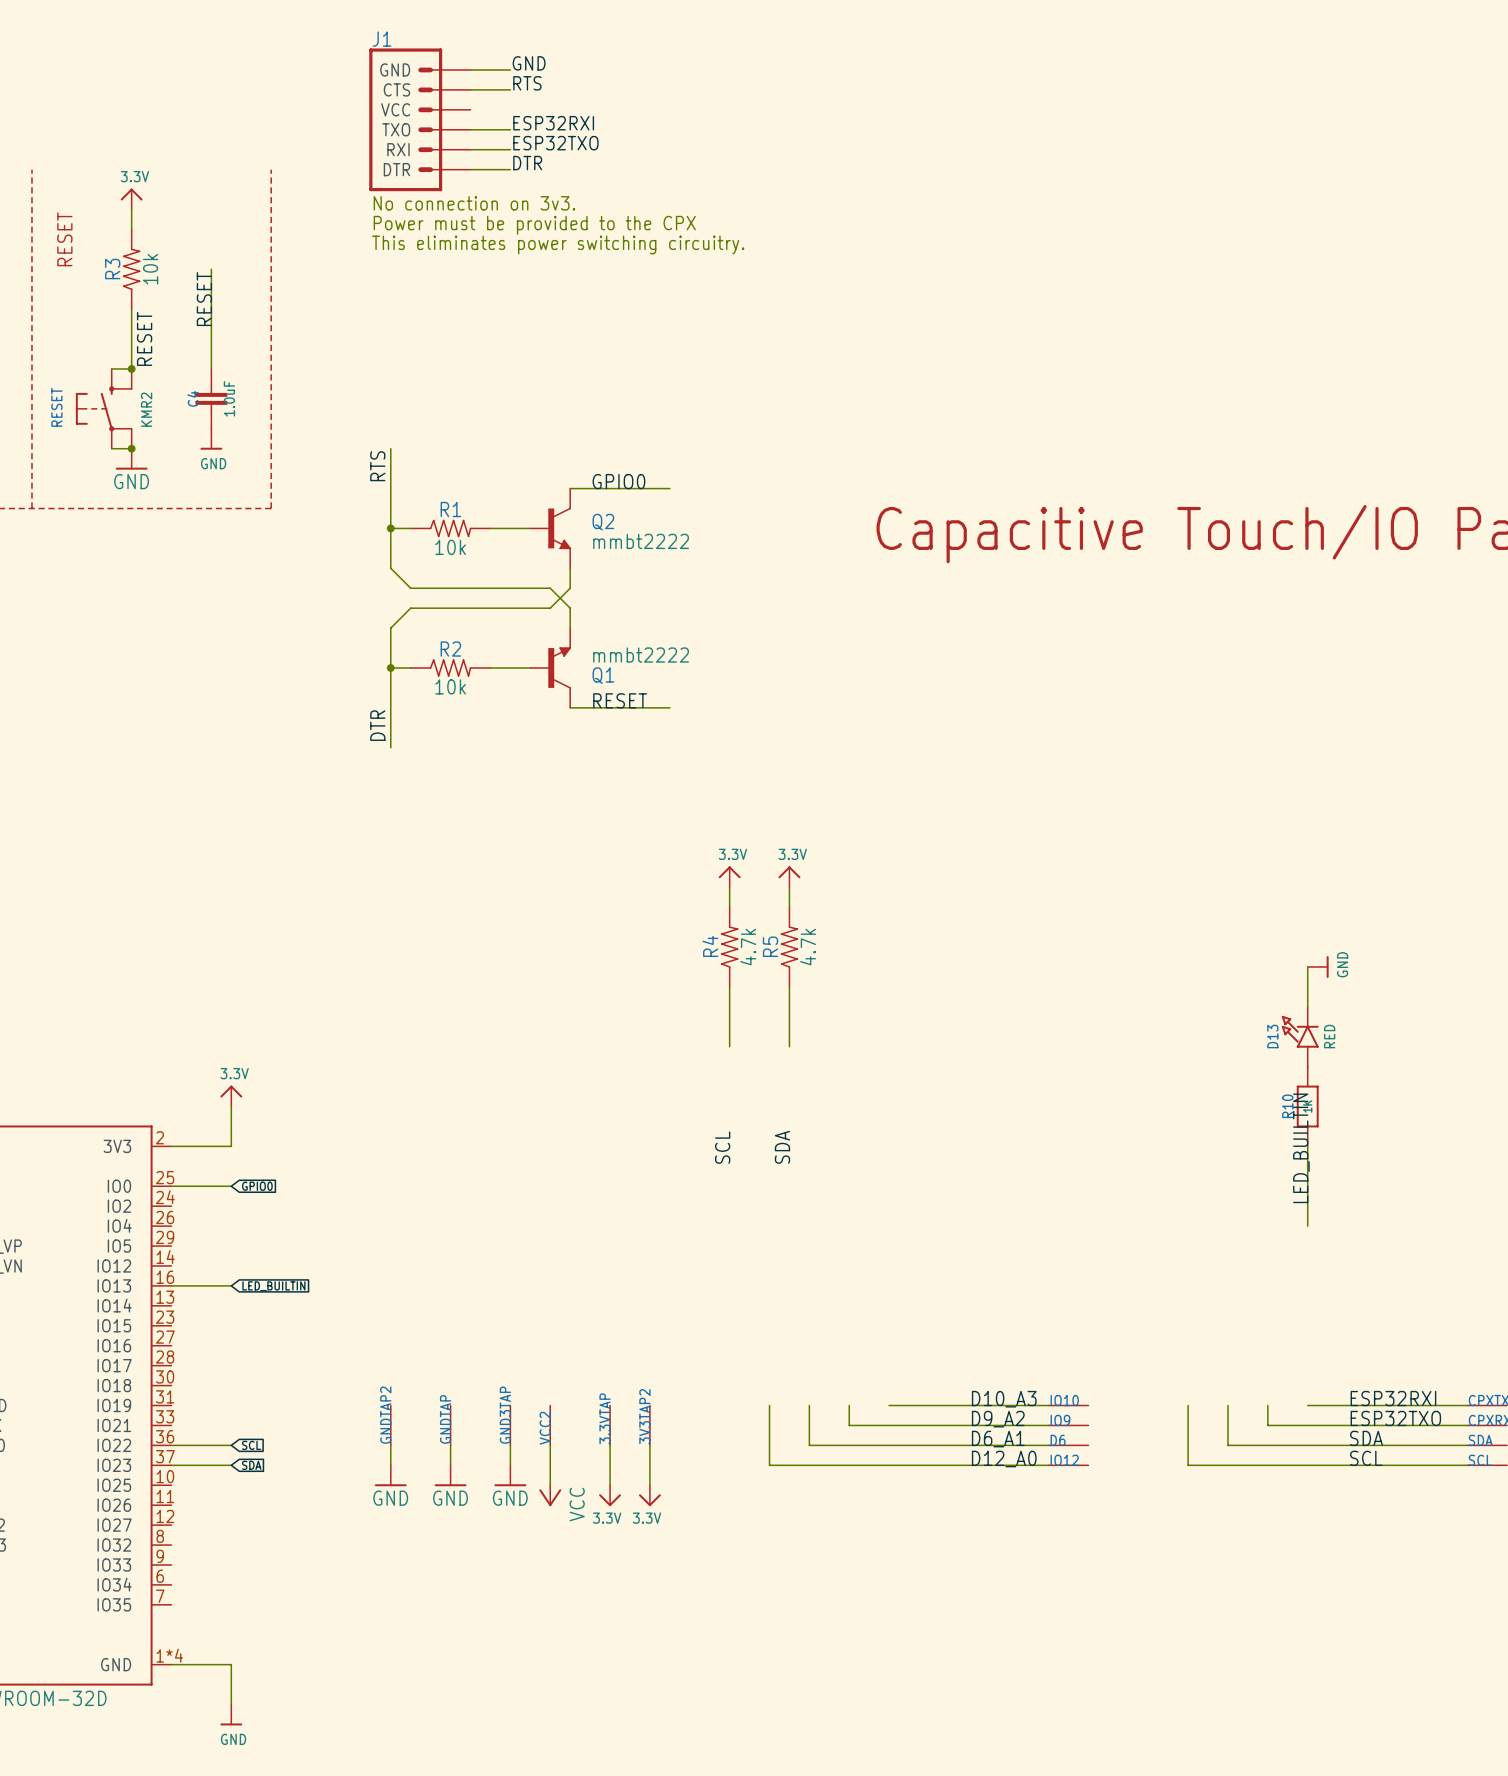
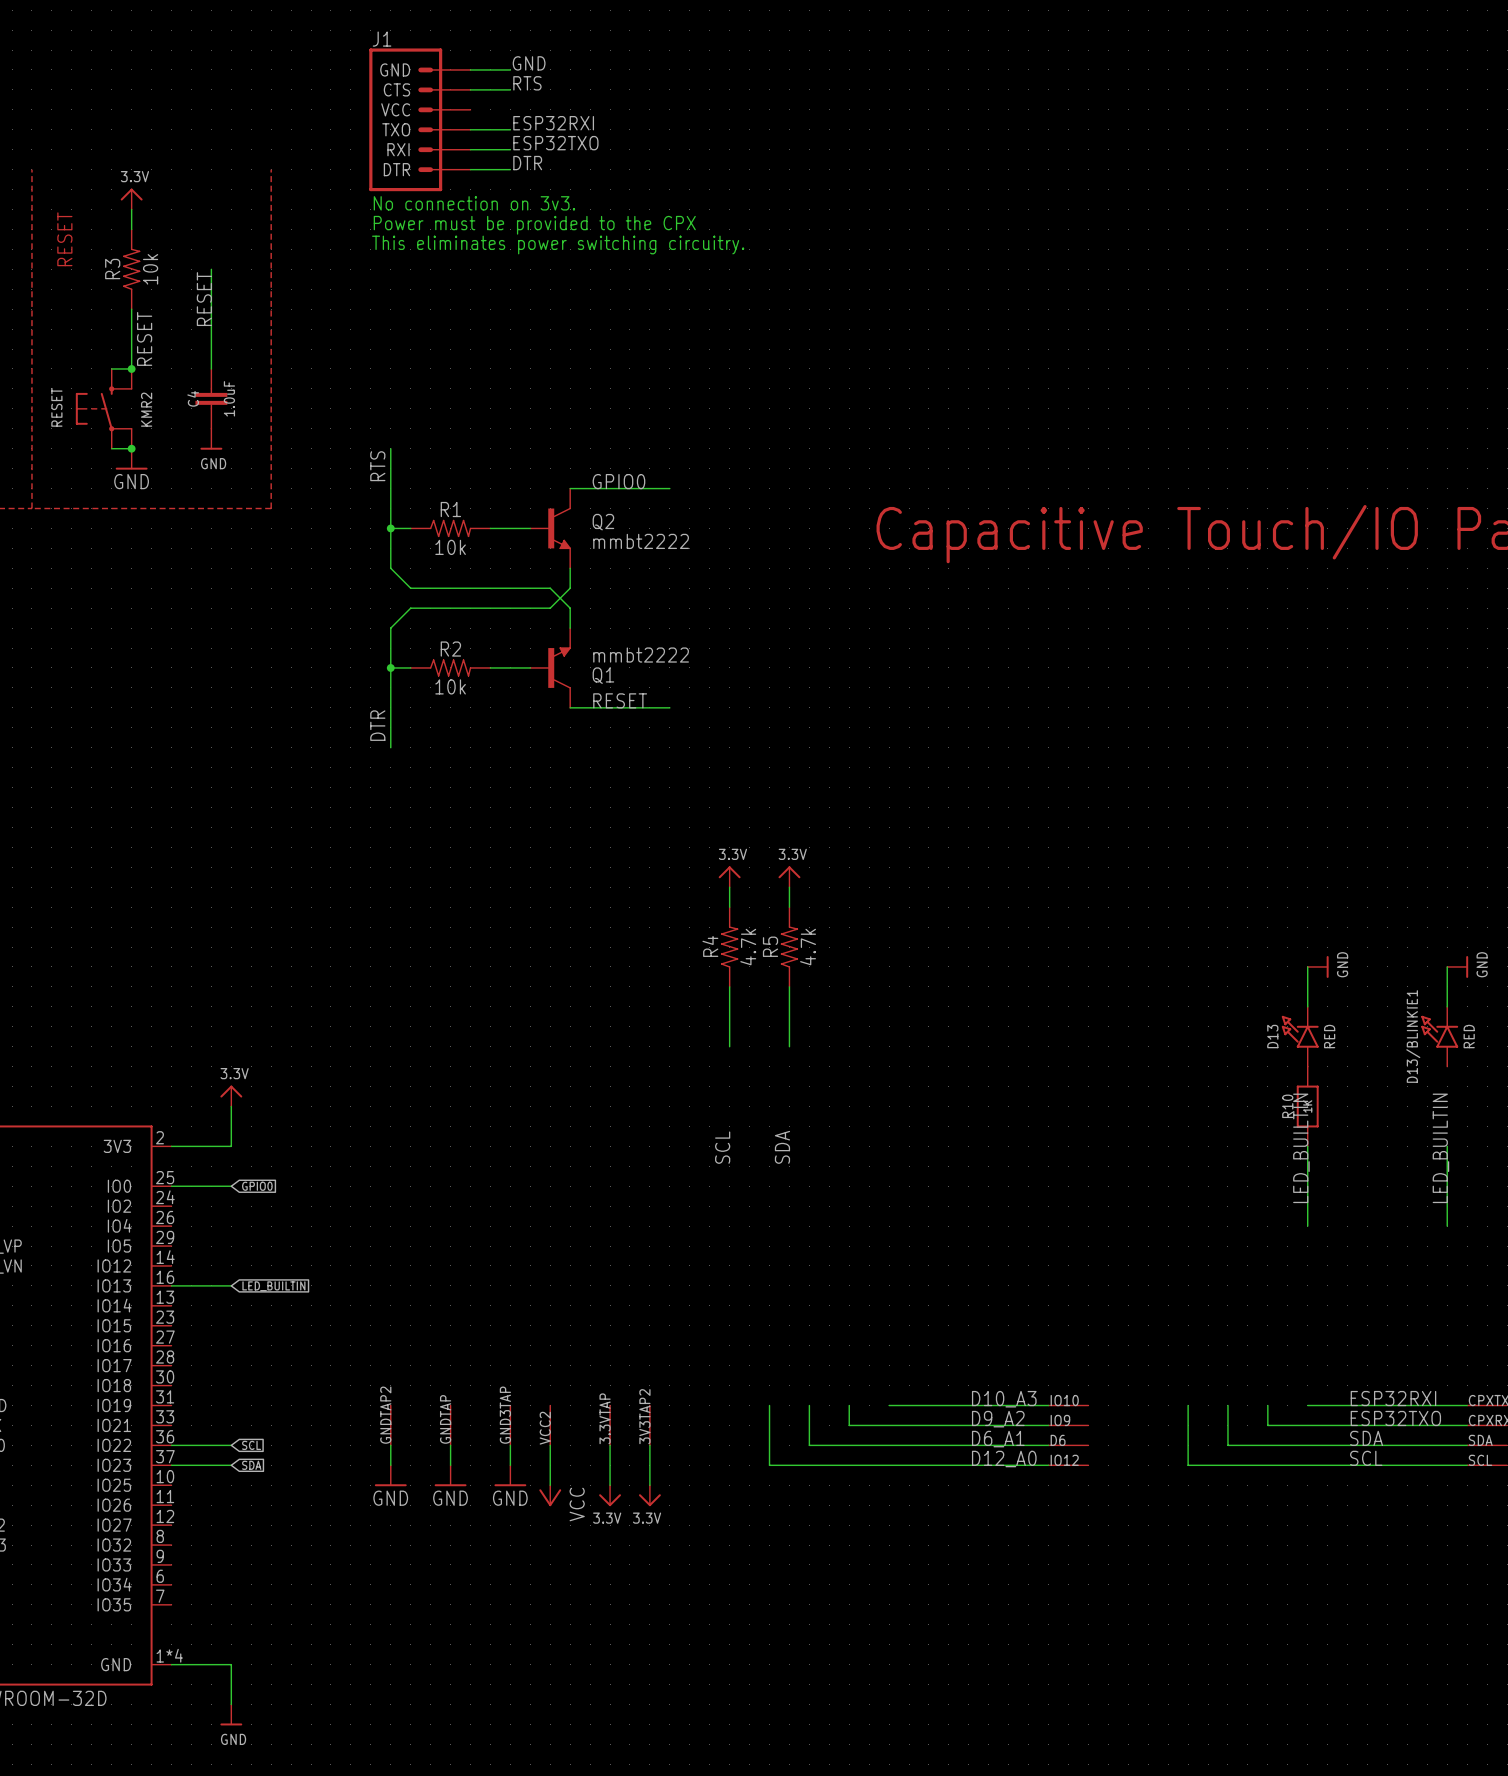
wire: none -> (1447, 966) (1447, 1006)
power symbol: none -> GND (1457, 966)
D13/BLINKIE1: none -> RED (1439, 1036)
wire: none -> (1447, 1146) (1447, 1226)
label: none -> LED_BUILTIN (1440, 1148)

